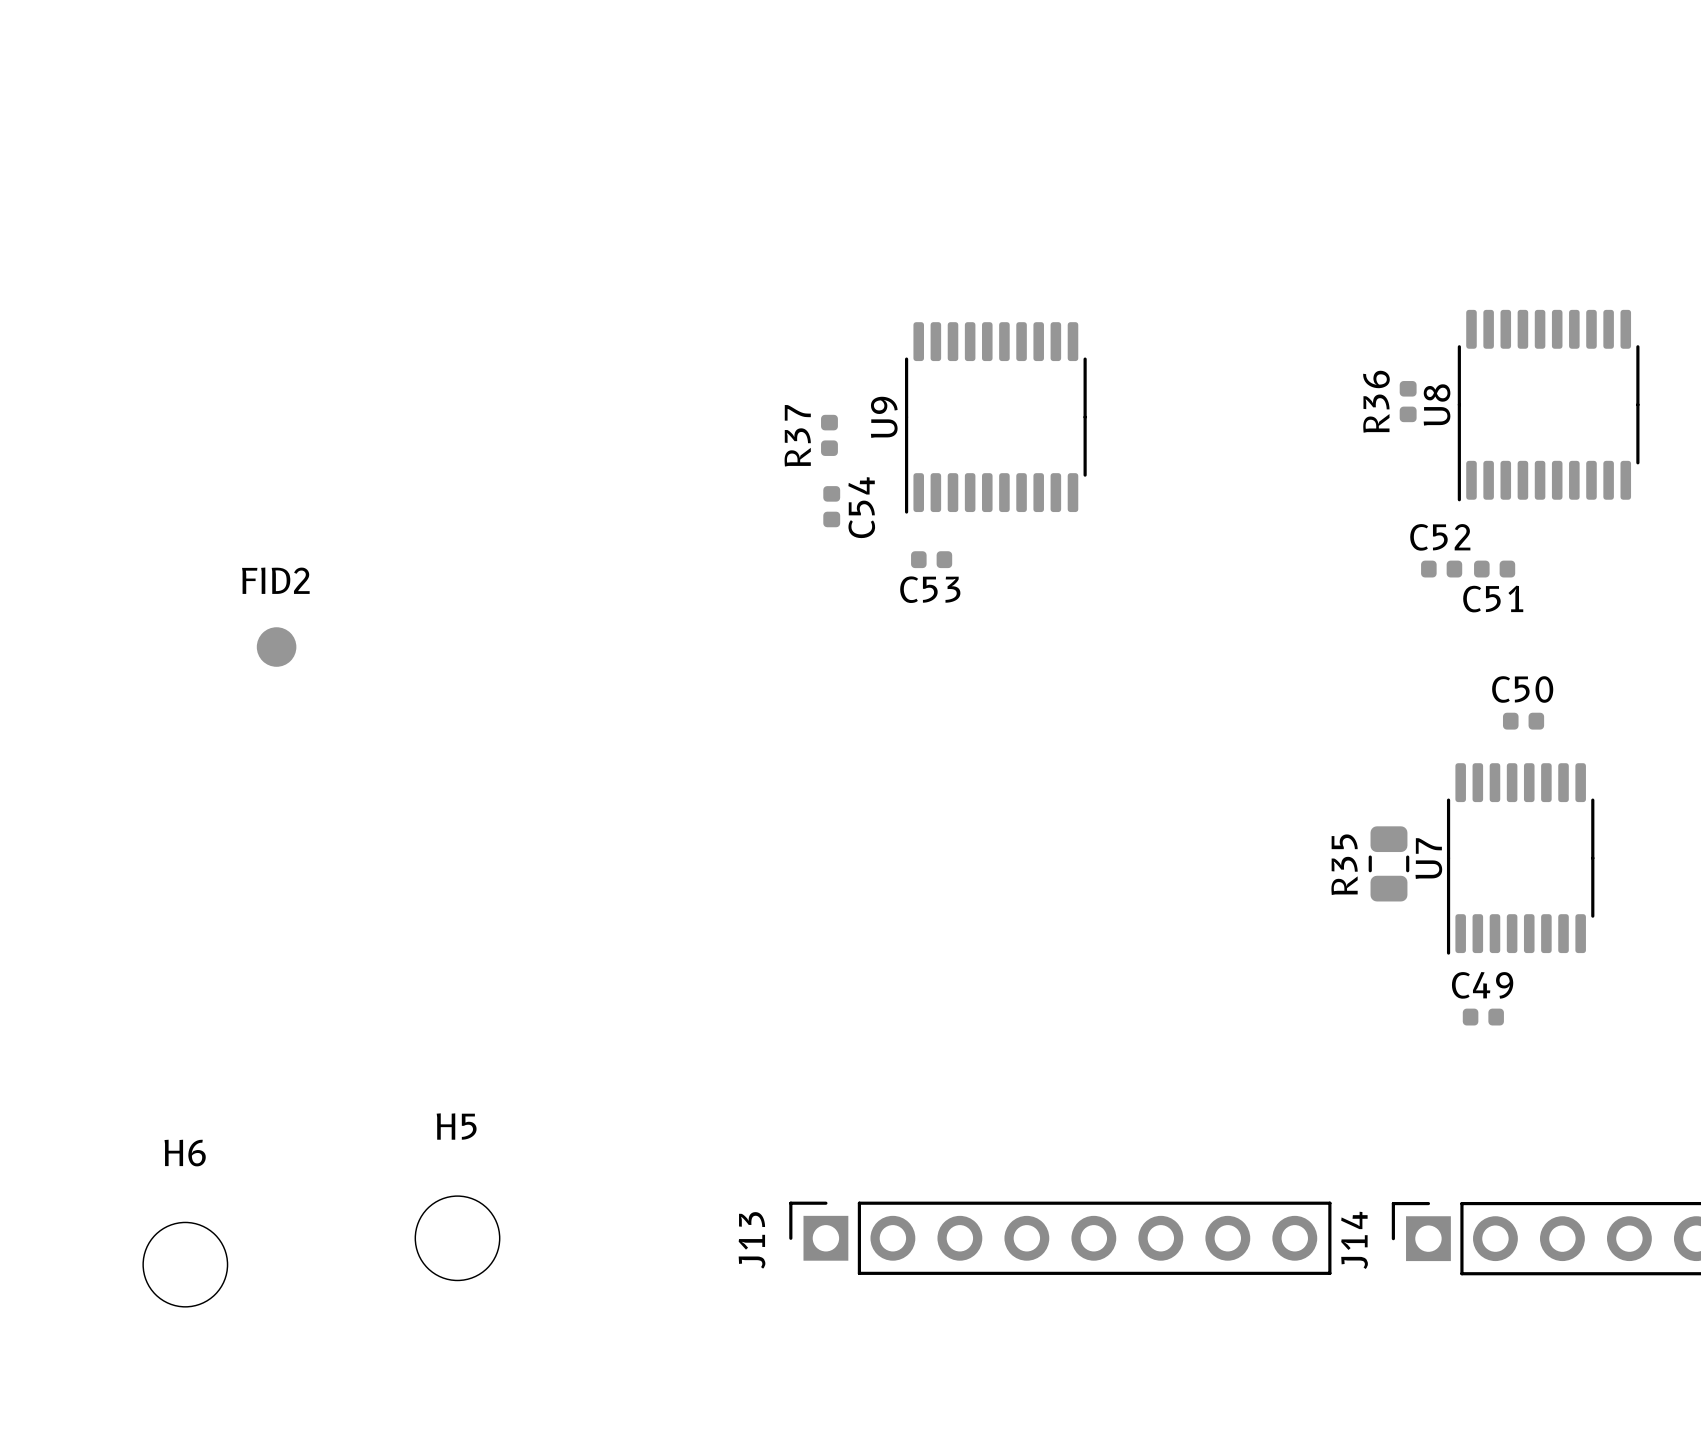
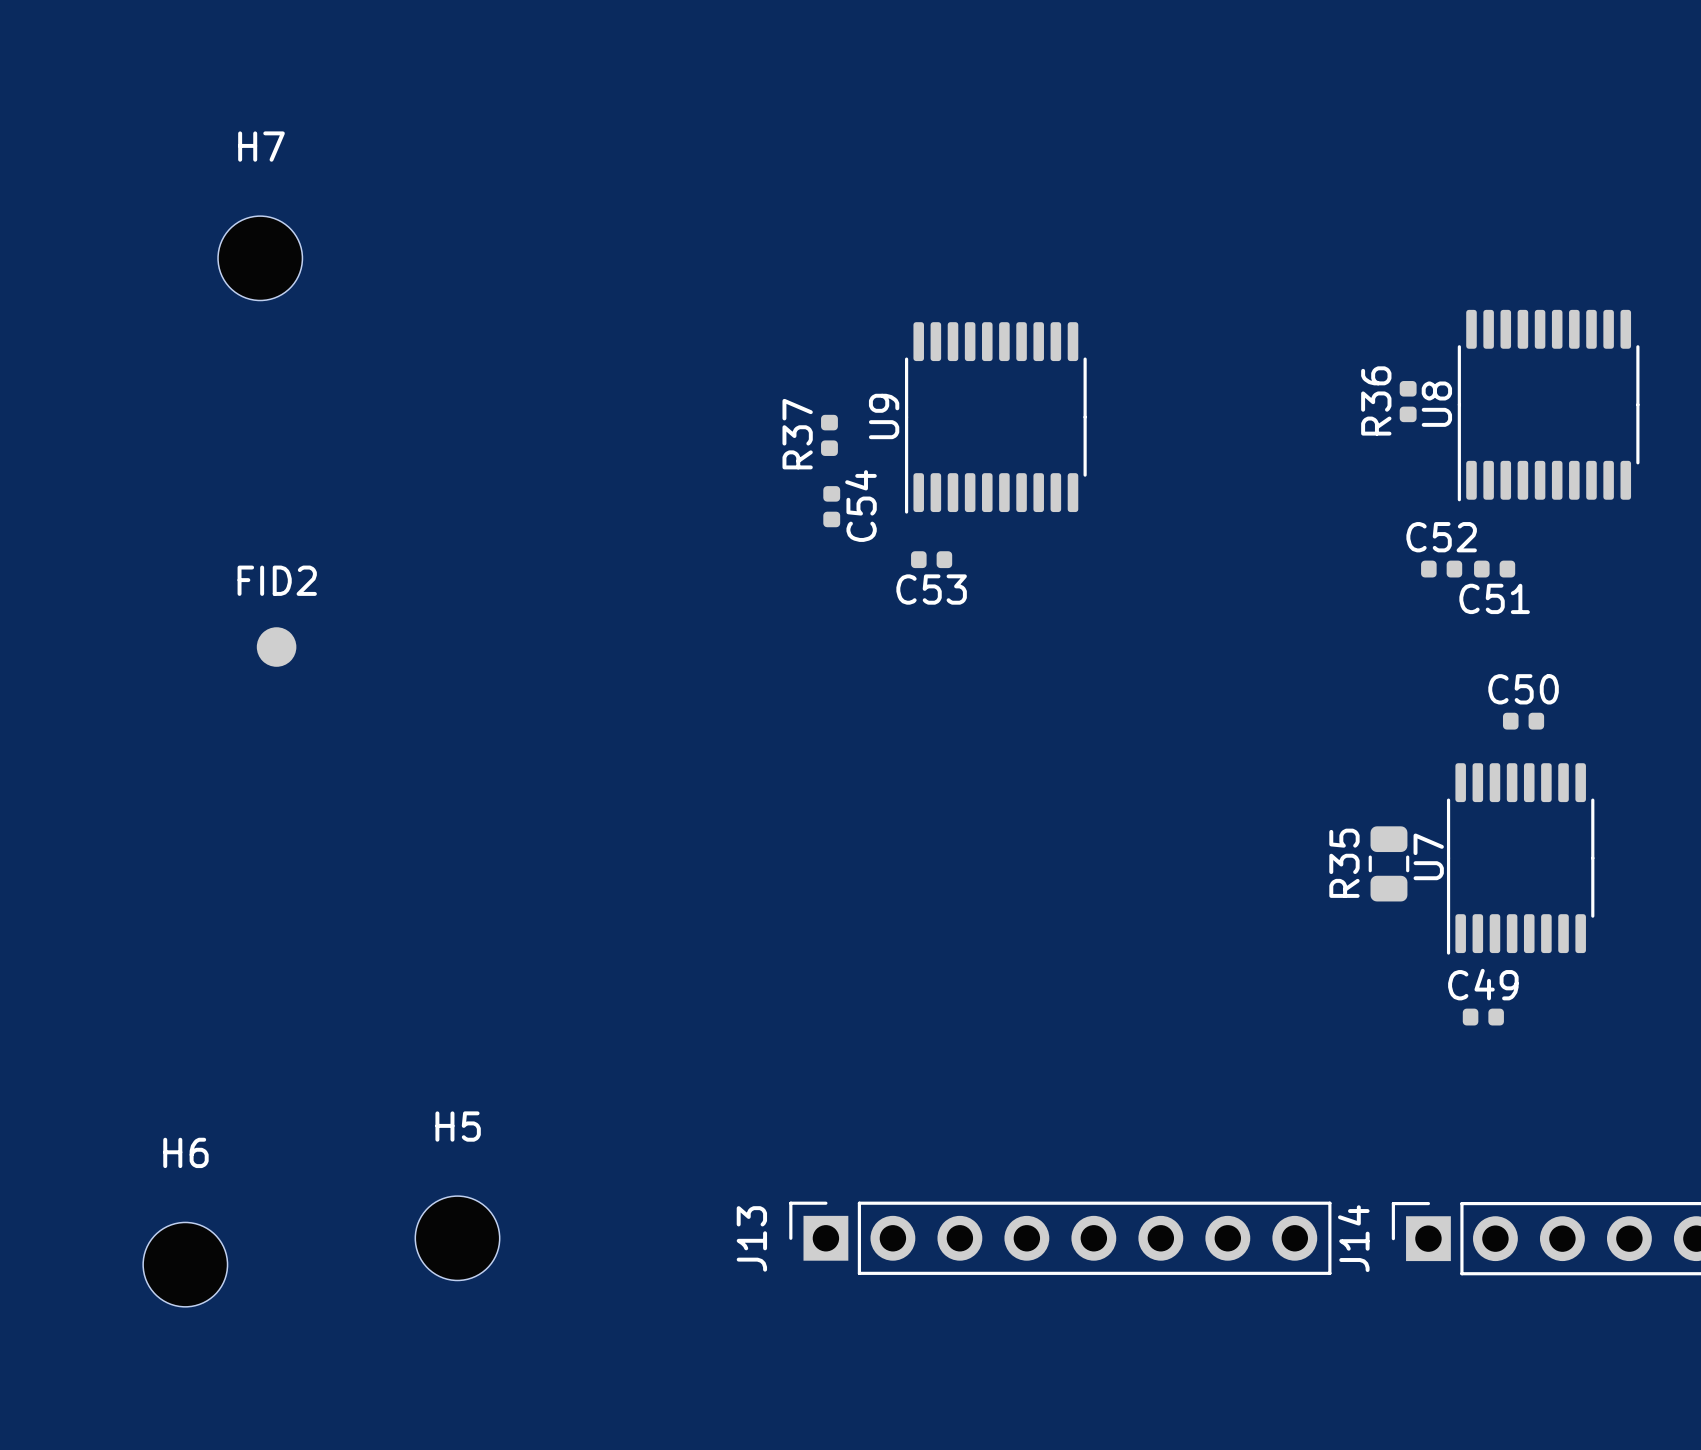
H7: none -> (260, 258)

